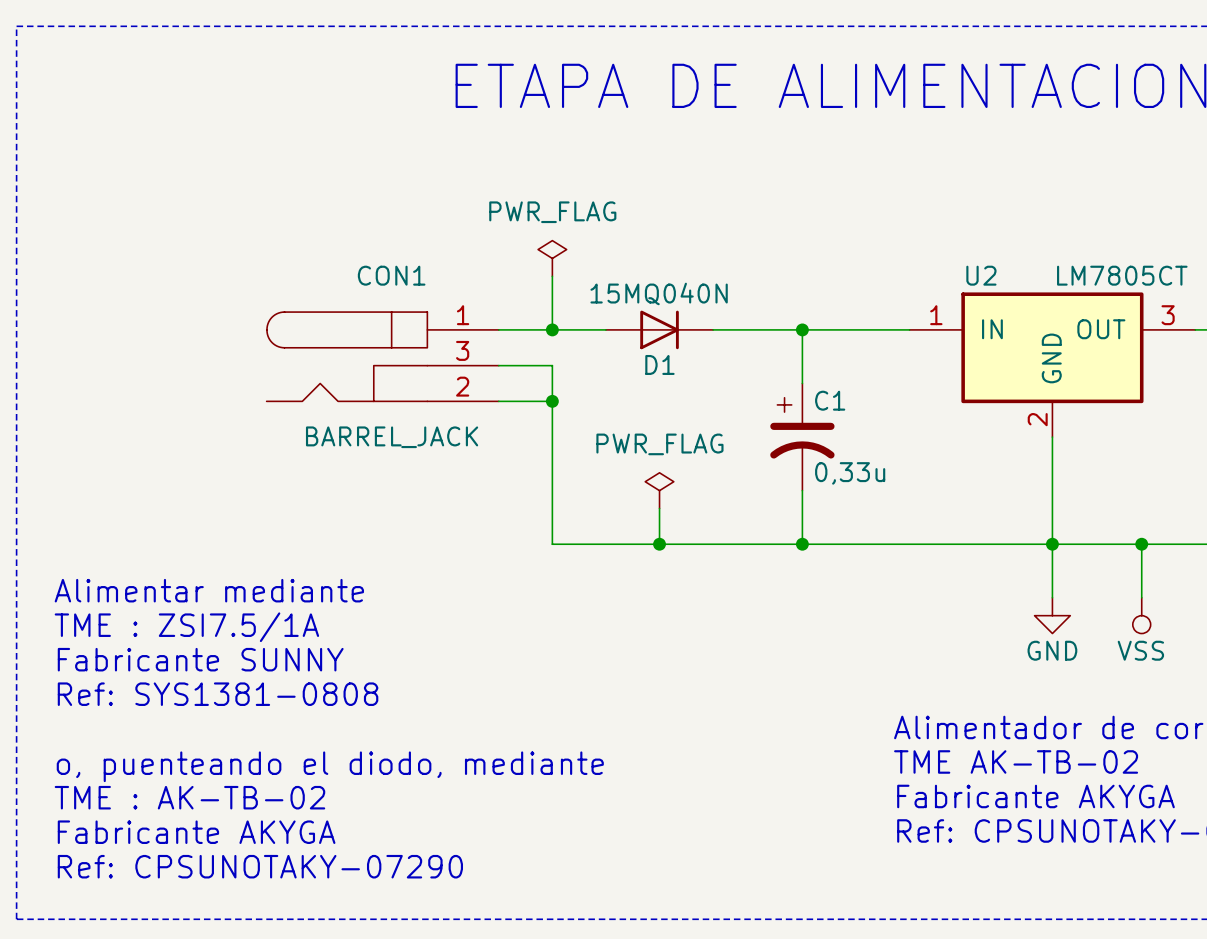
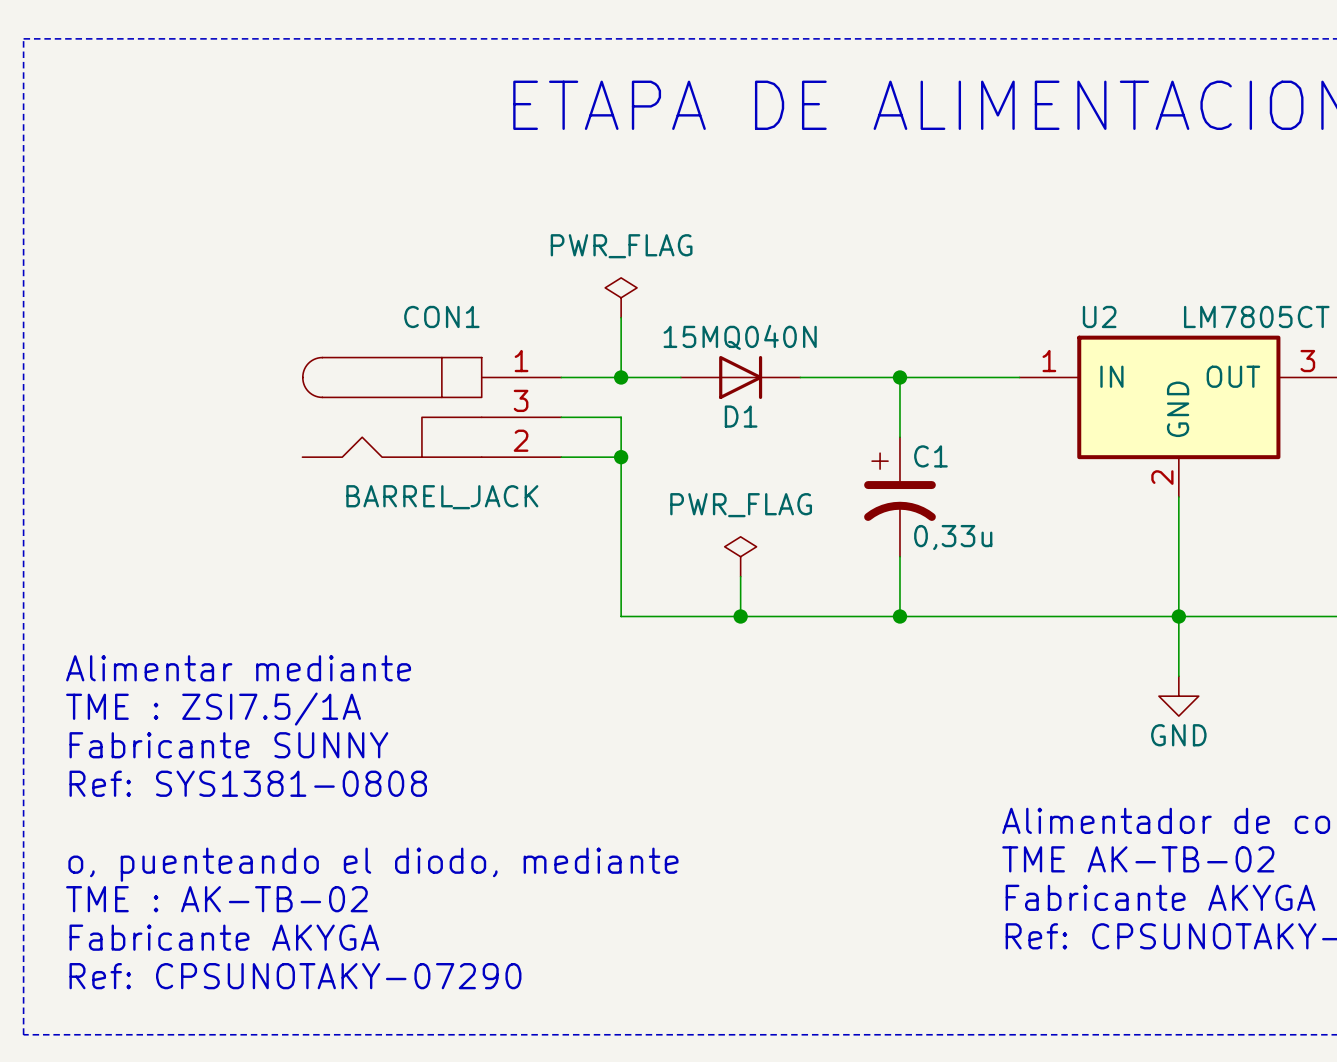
wire: (1141, 544) (1141, 597) -> none
junction: (1141, 544) -> none
power symbol: VSS (1141, 615) -> none

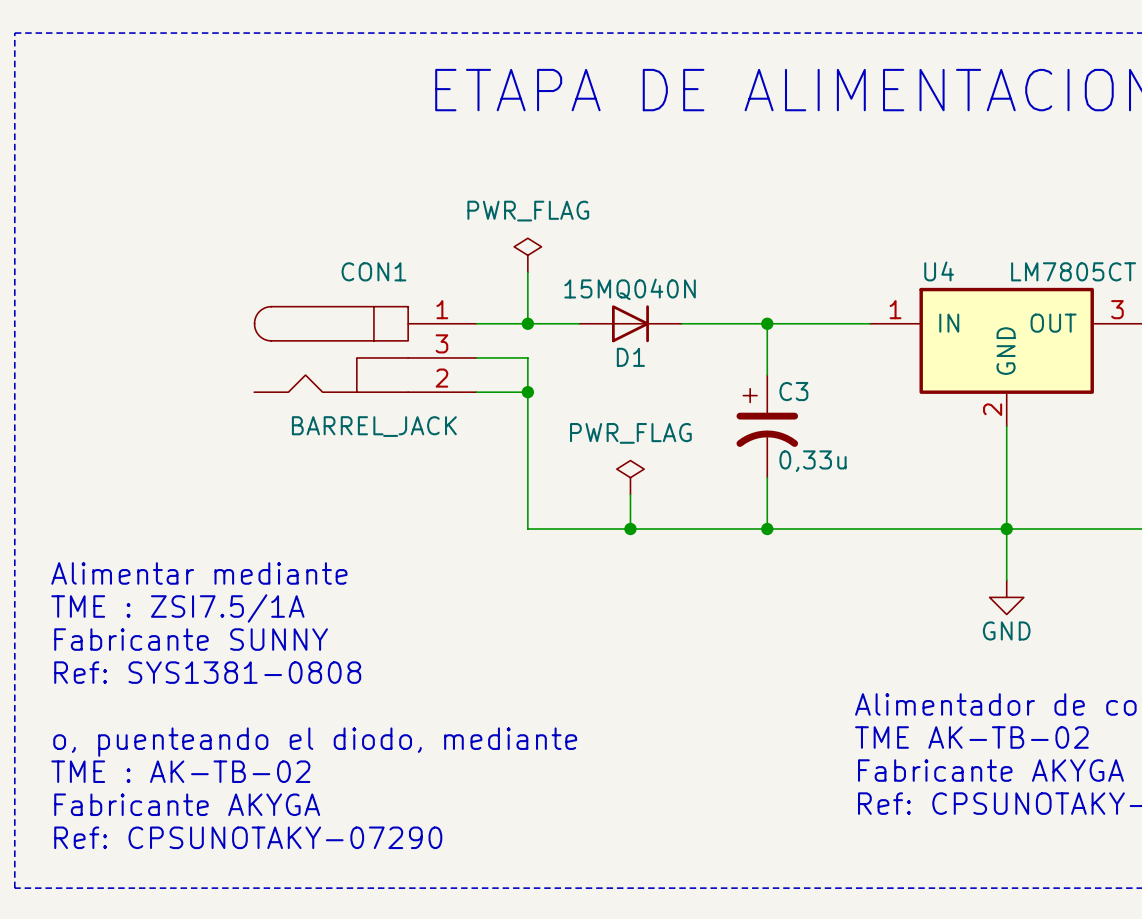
U2 name: U2 (1099, 316) -> U4 (939, 271)
C1 name: C1 (930, 456) -> C3 (793, 391)

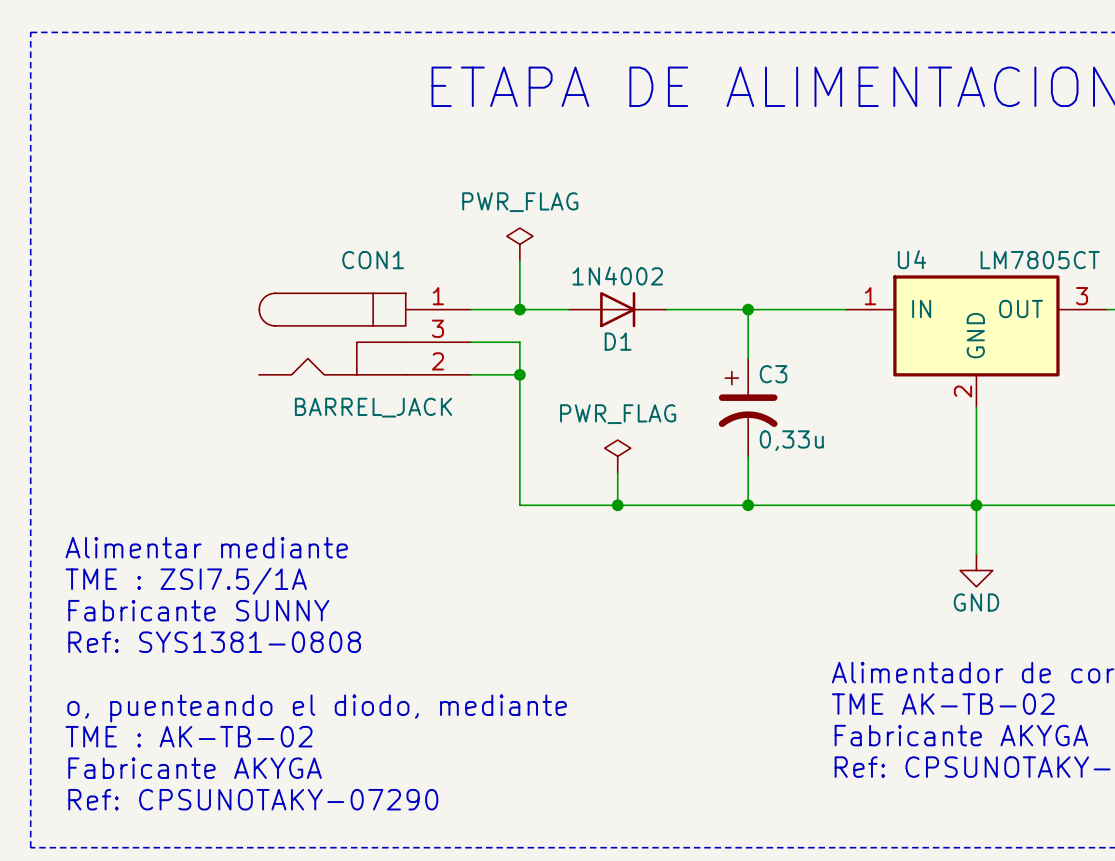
D1 value: 15MQ040N (630, 289) -> 1N4002 (617, 276)

